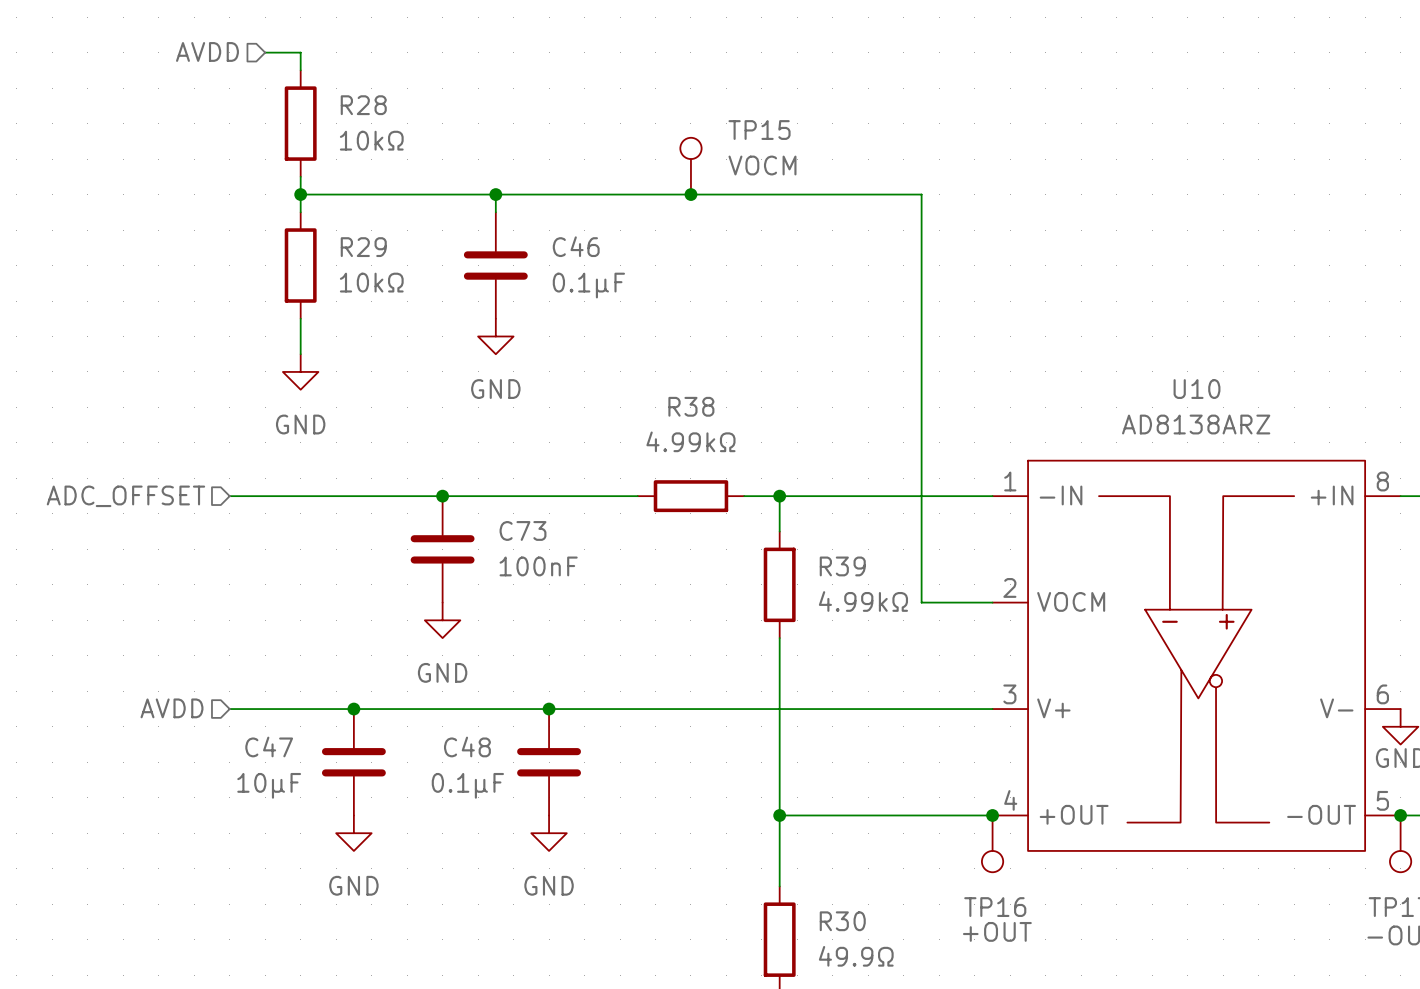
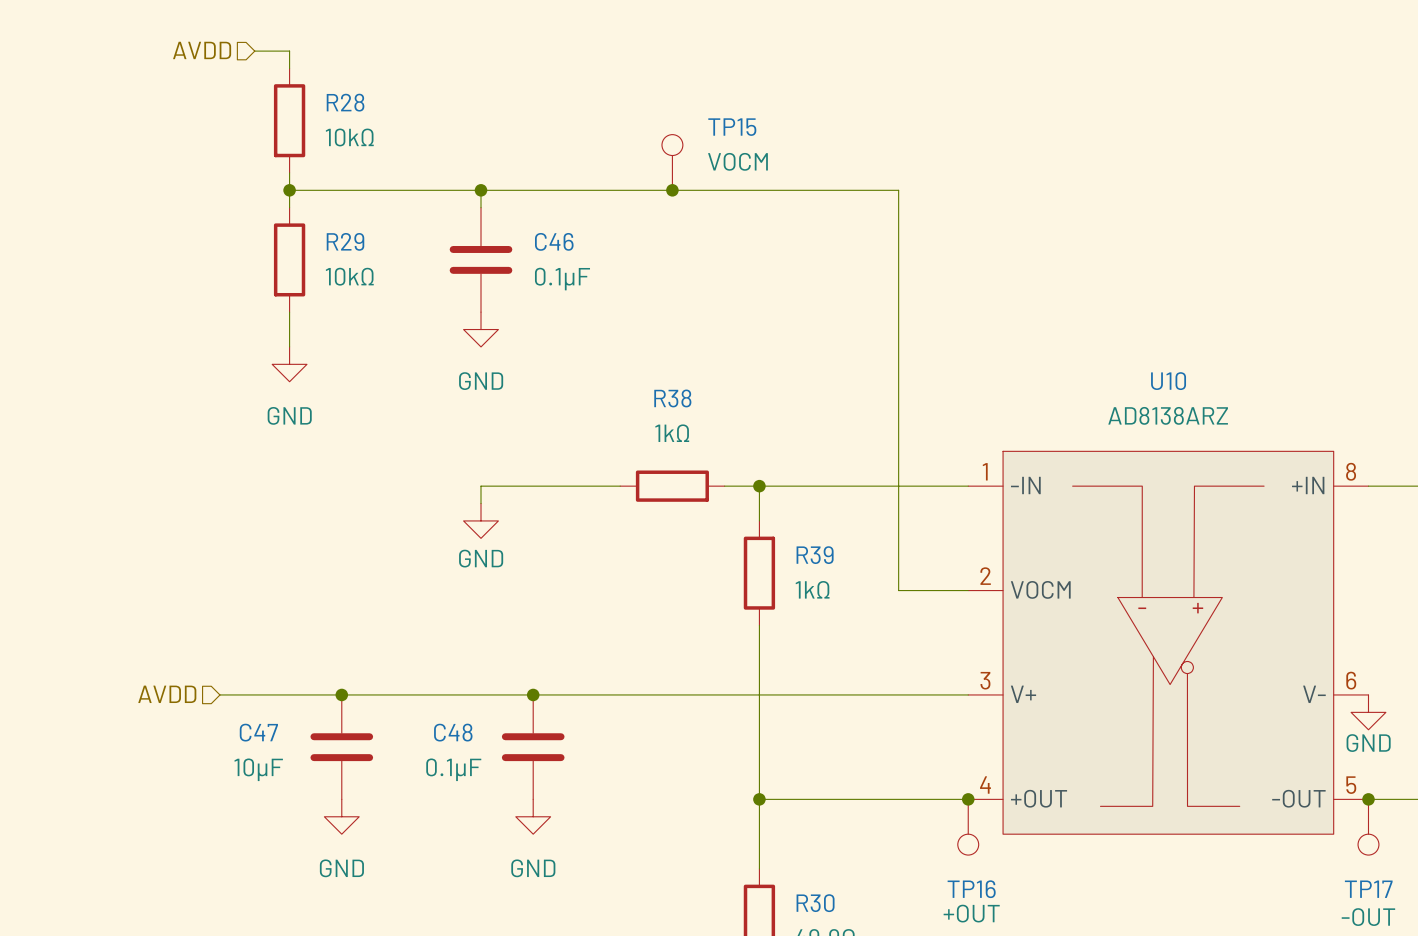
R38 value: 4.99kΩ (690, 441) -> 1kΩ (672, 433)
hierarchical label: ADC_OFFSET (125, 496) -> none
wire: (229, 496) (495, 496) -> (481, 503) (481, 486)
junction: (442, 496) -> none
C73: 100nF (442, 549) -> none
R39 value: 4.99kΩ (863, 601) -> 1kΩ (812, 589)
power symbol position: GND (442, 620) -> GND (481, 520)
power symbol text position: GND (442, 672) -> GND (481, 558)

